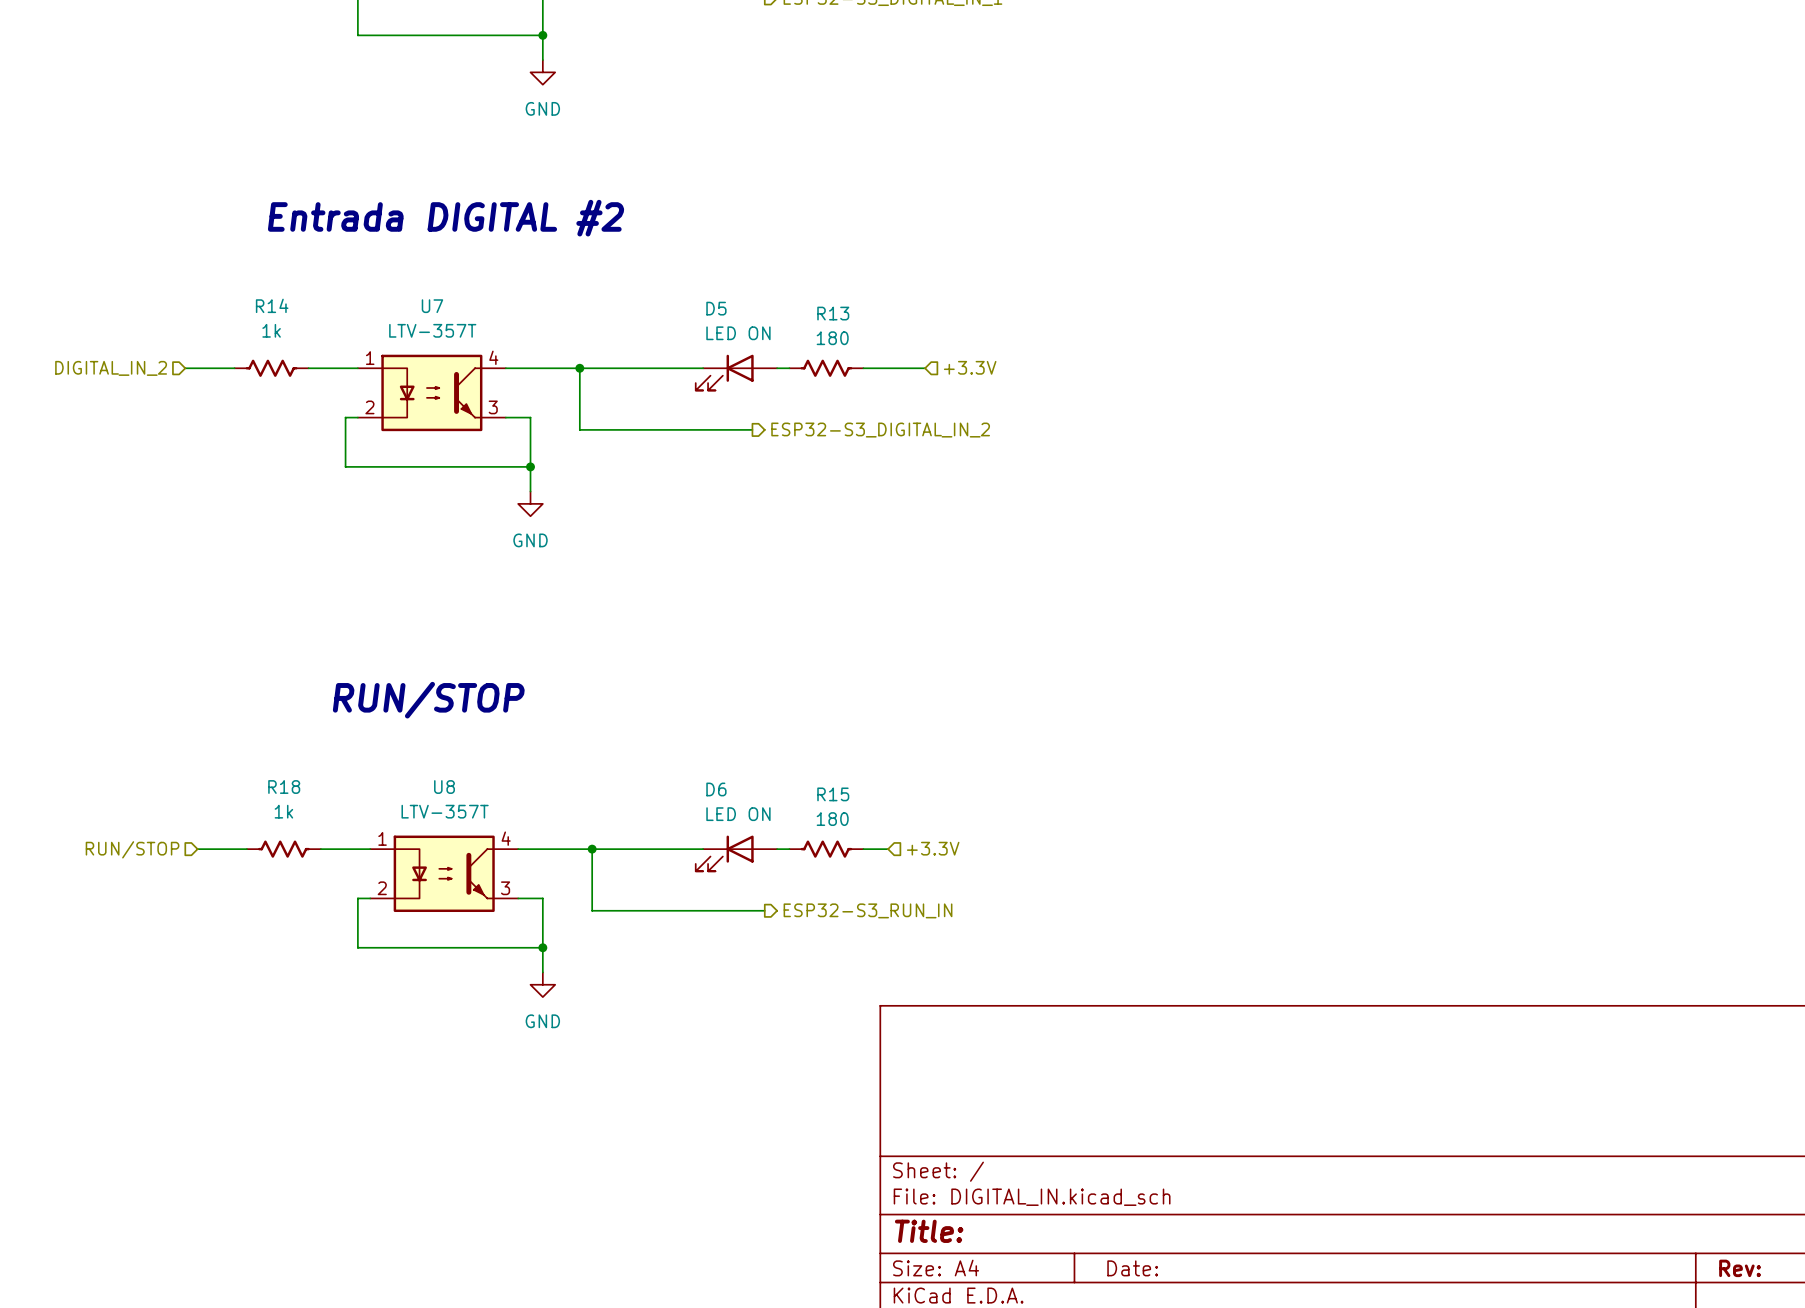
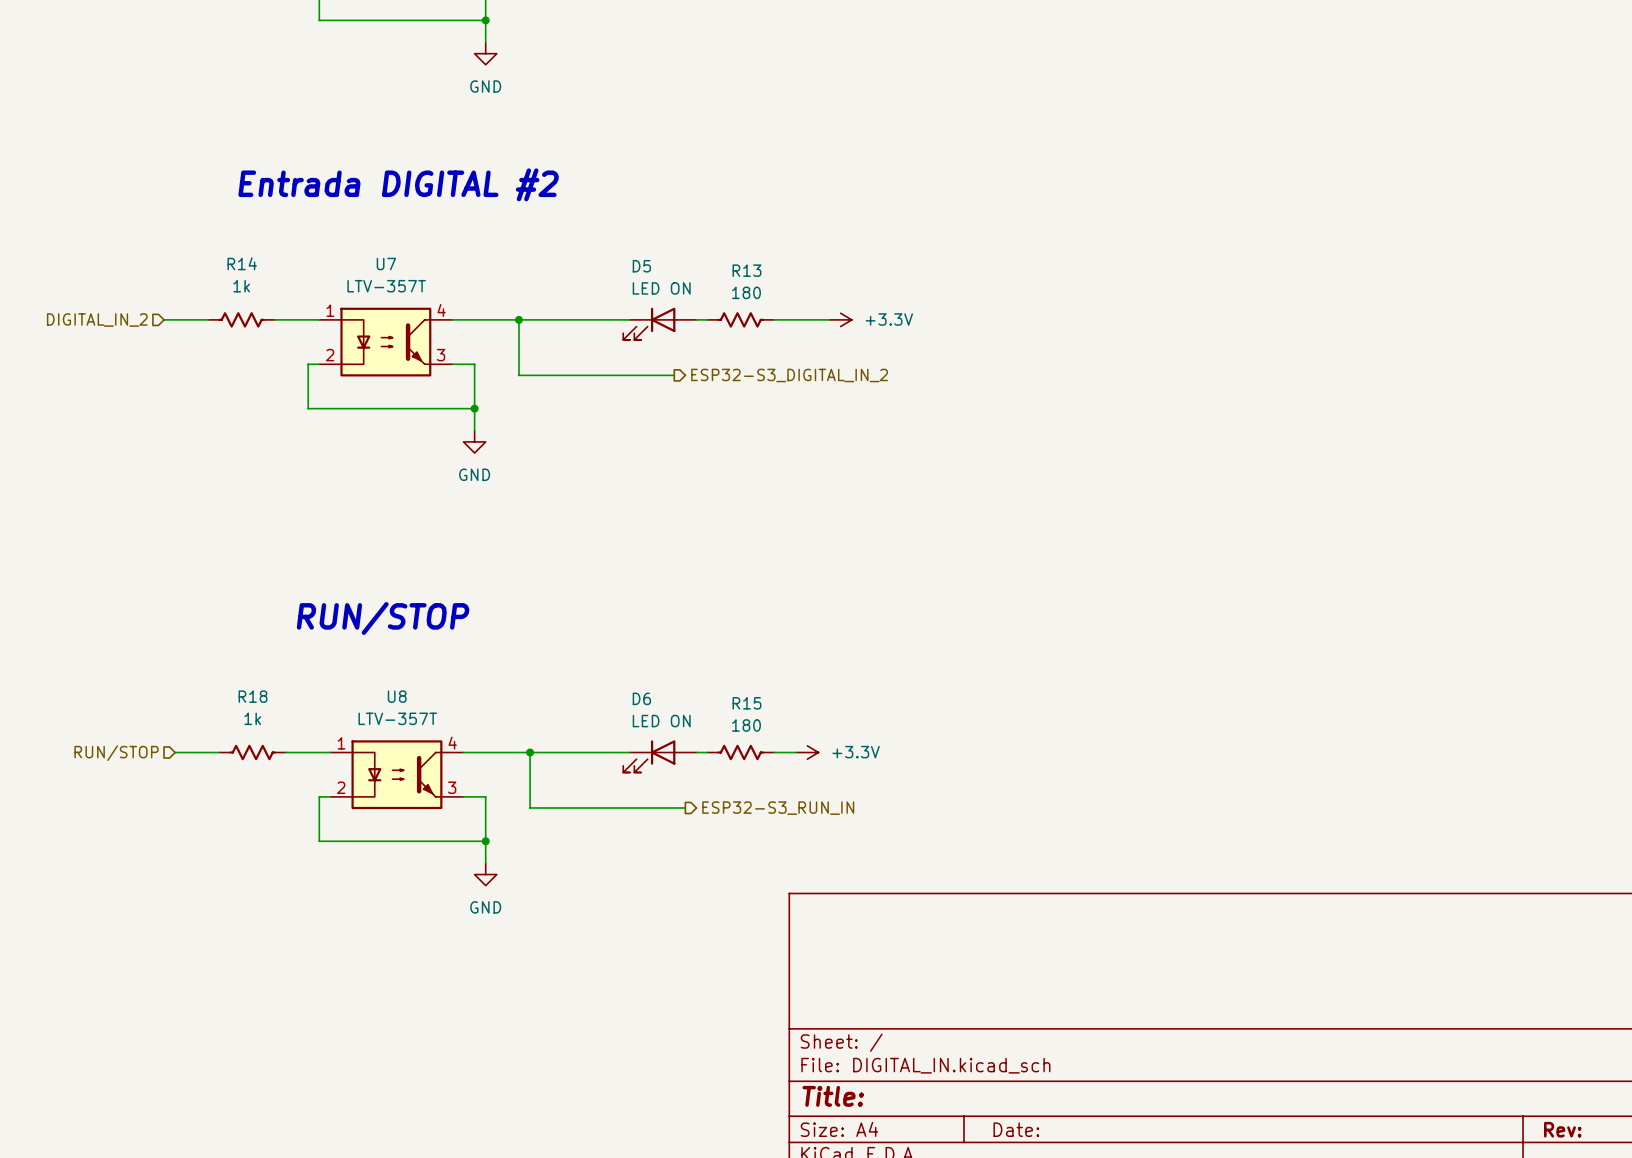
hierarchical label: +3.3V (970, 367) -> none
power symbol: none -> +3.3V (840, 319)
hierarchical label: +3.3V (933, 848) -> none
power symbol: none -> +3.3V (807, 752)

